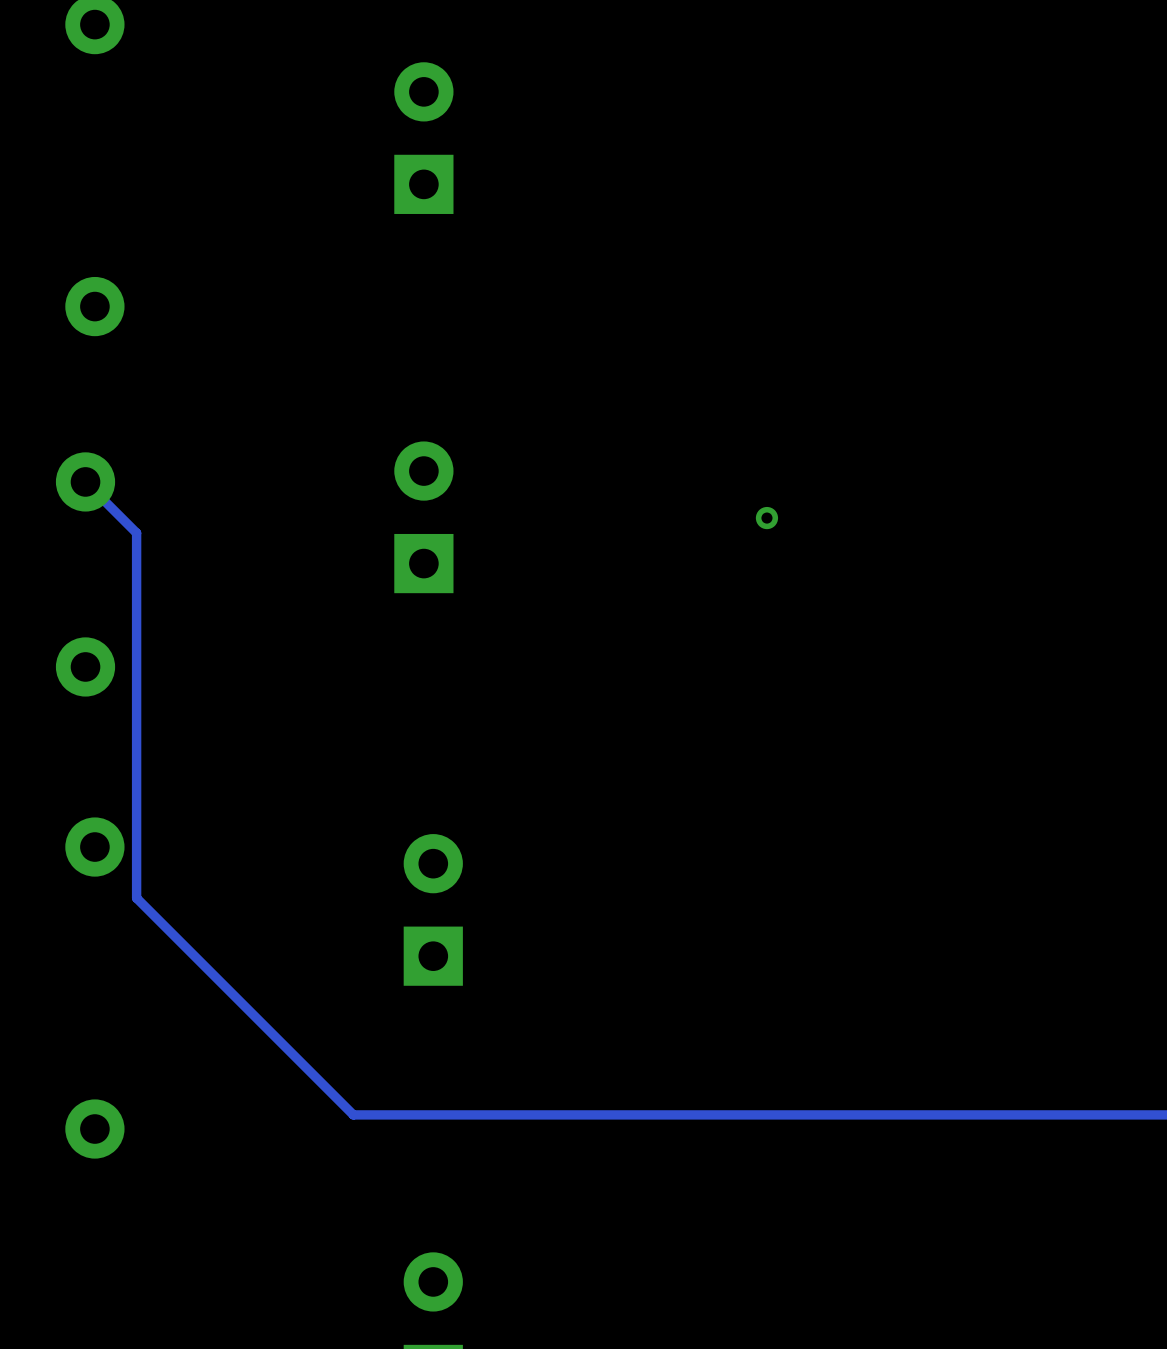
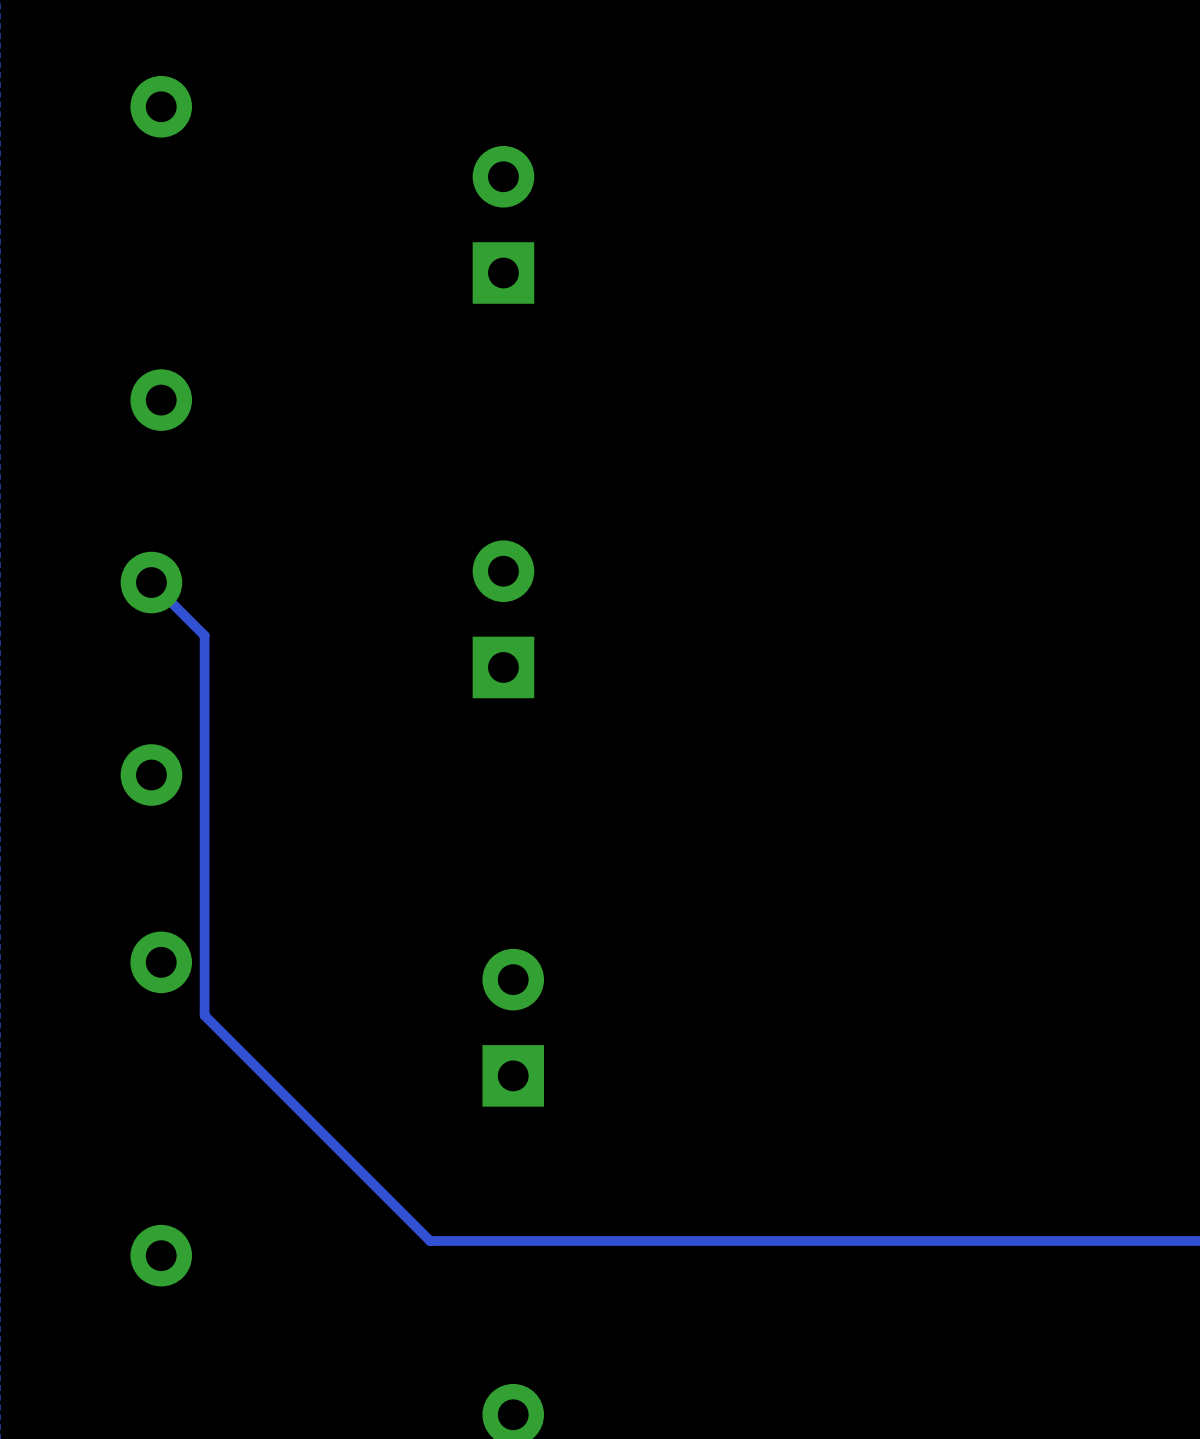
via: (766, 518) -> none

